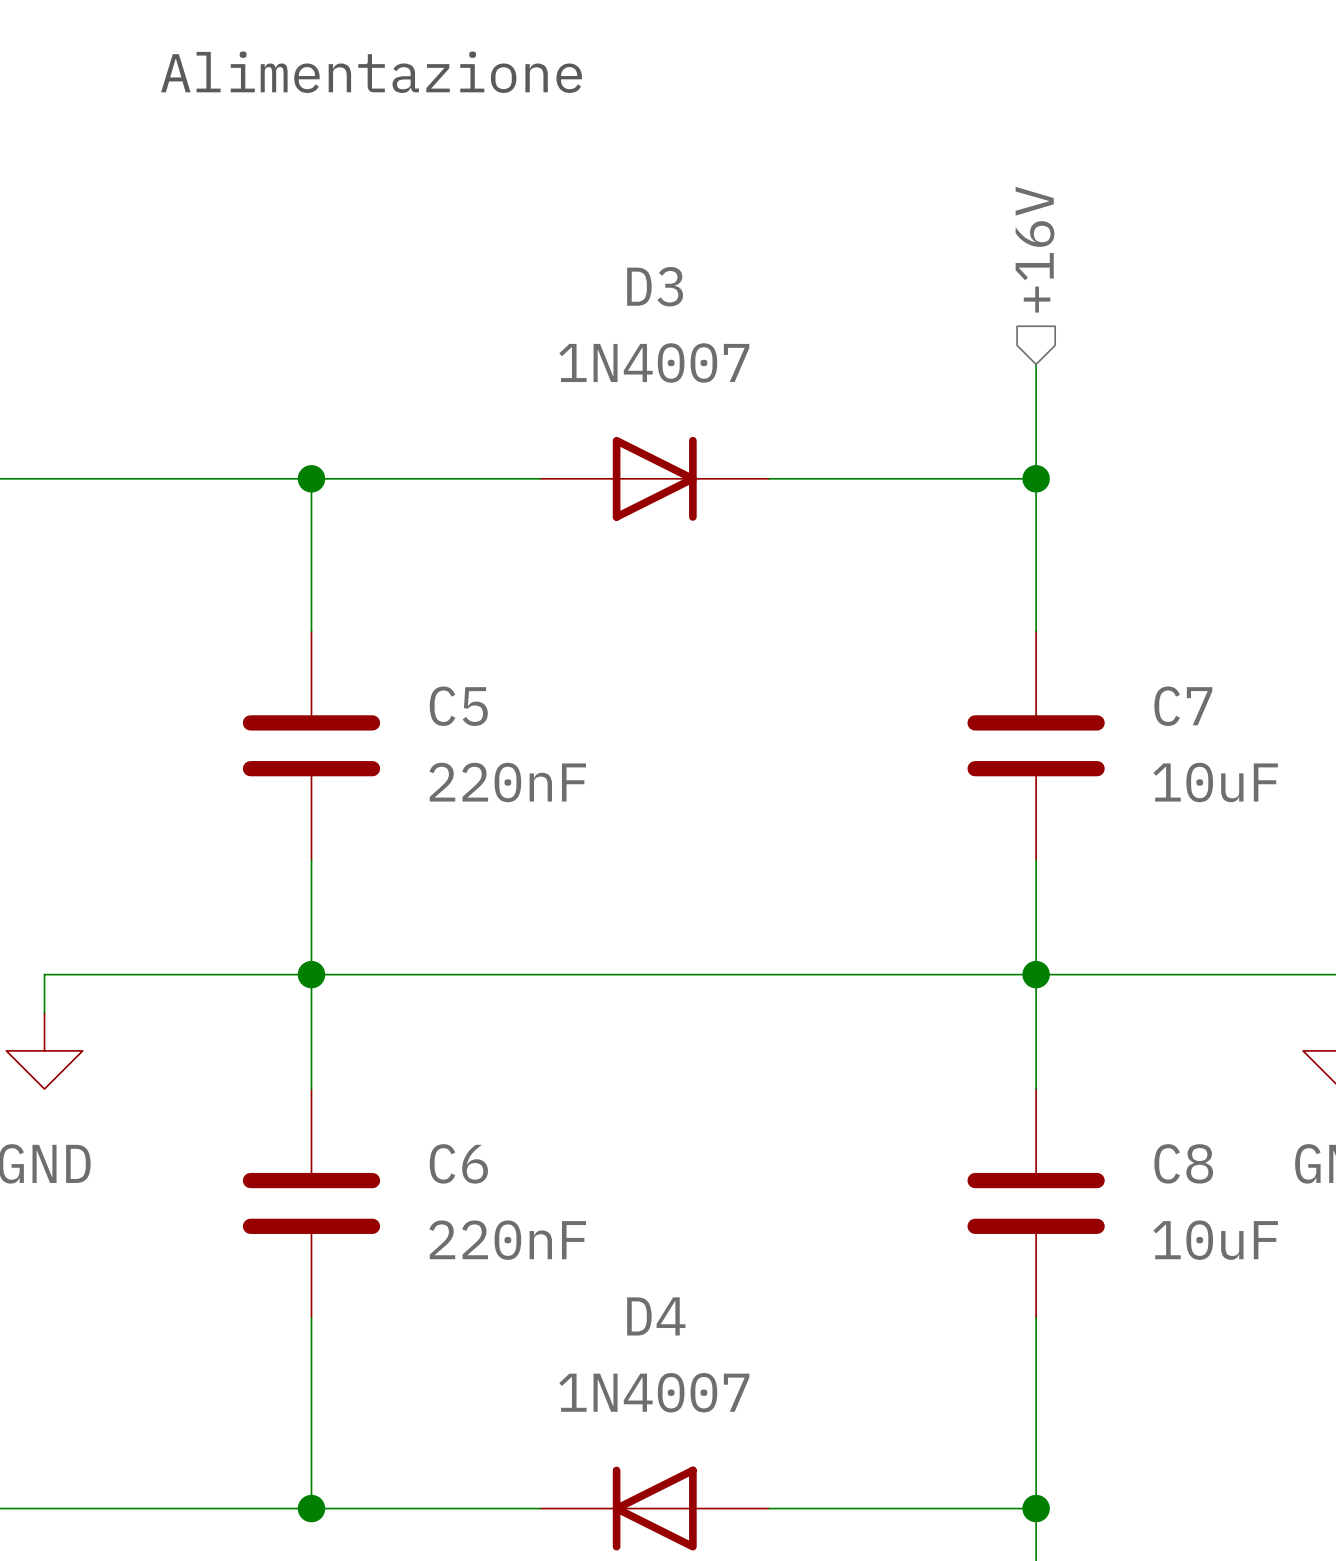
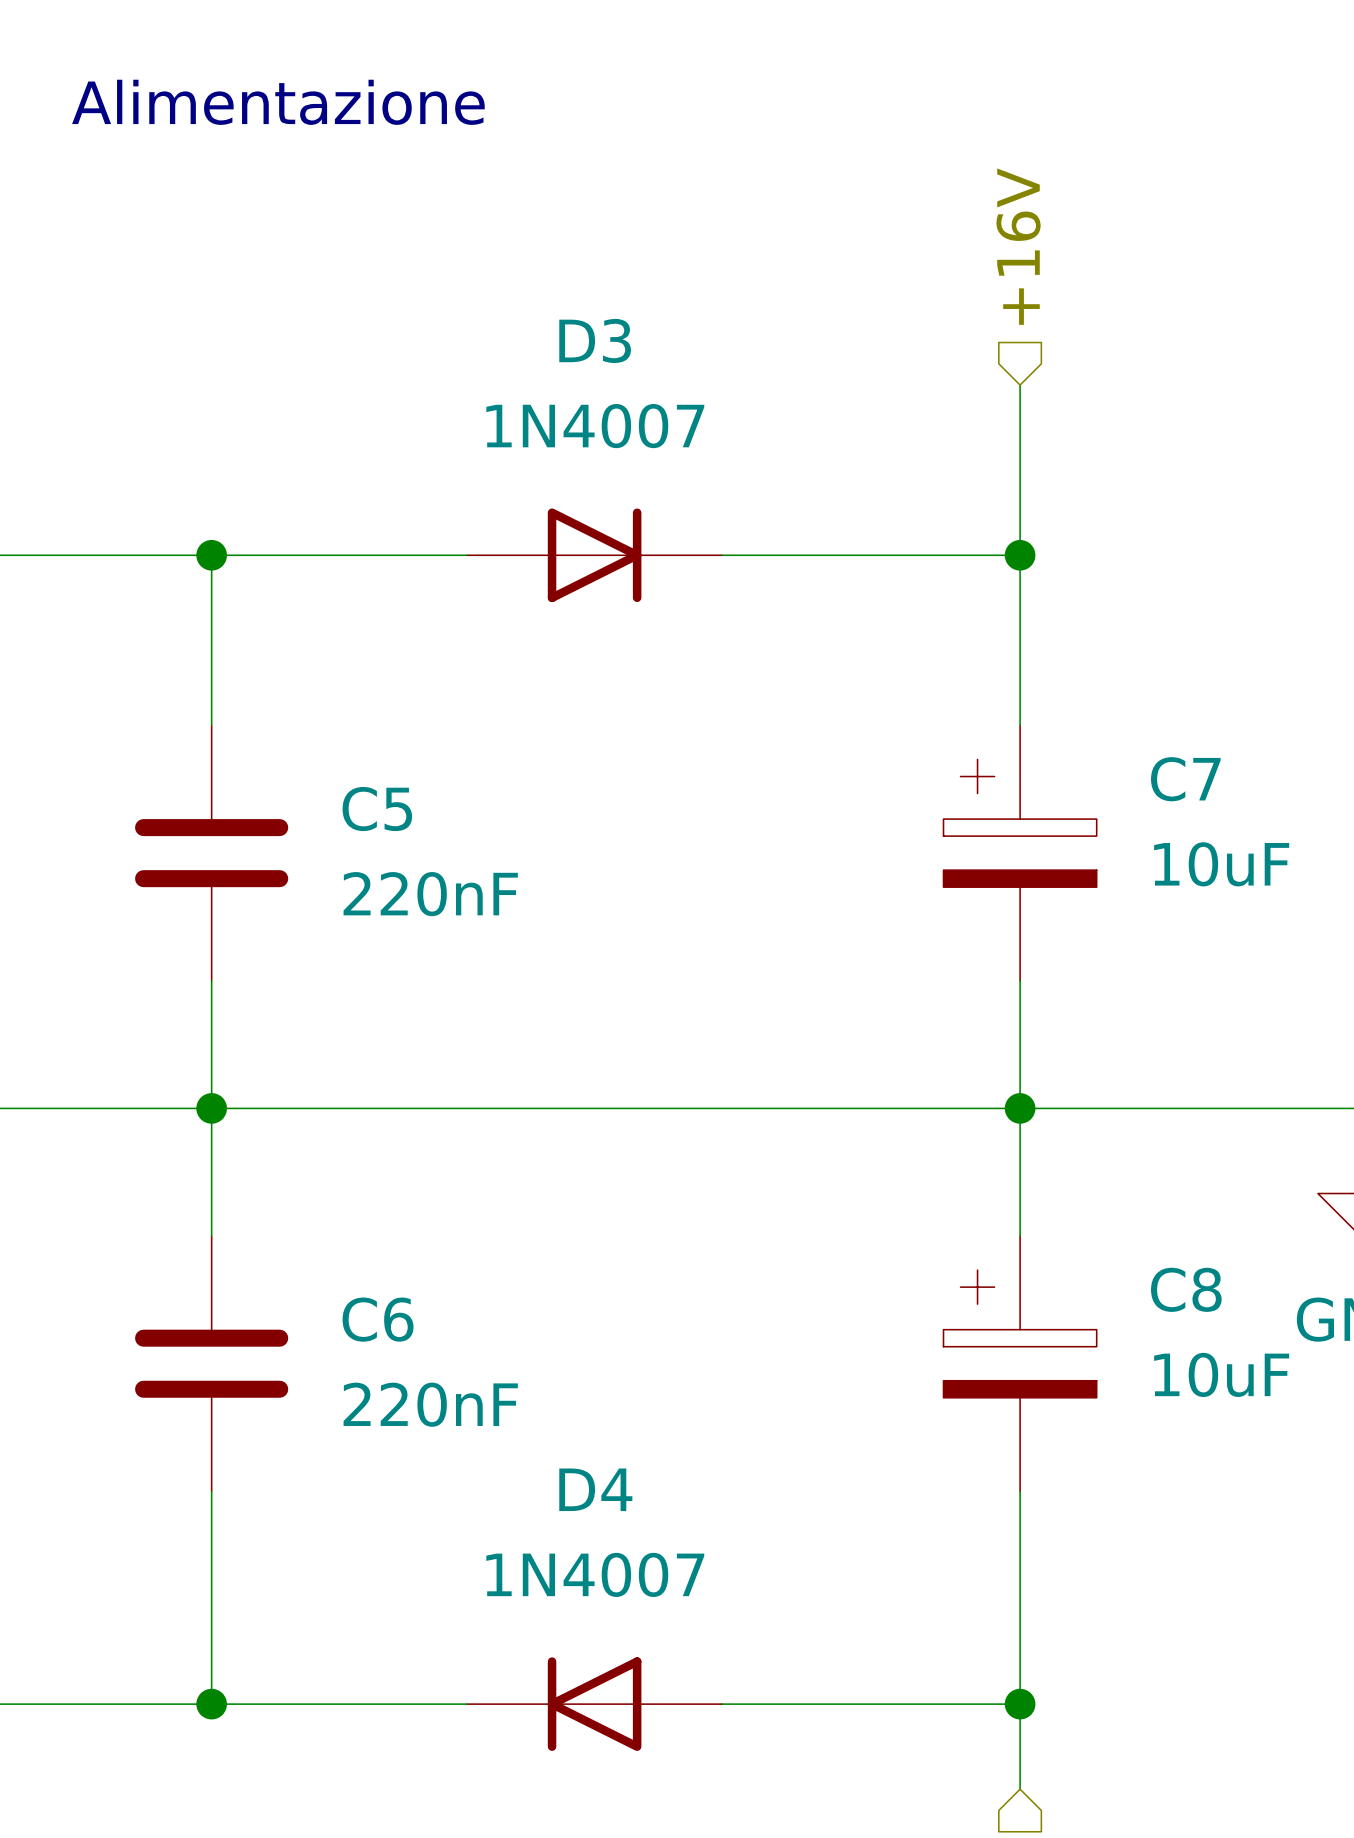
hierarchical label position: +16V (1035, 249) -> +16V (1018, 246)
wire: none -> (1020, 385) (1020, 427)
C7 symbol: [967, 631, 1105, 861] -> [943, 725, 1097, 981]
C8 symbol: [967, 1089, 1105, 1318] -> [943, 1236, 1097, 1492]

